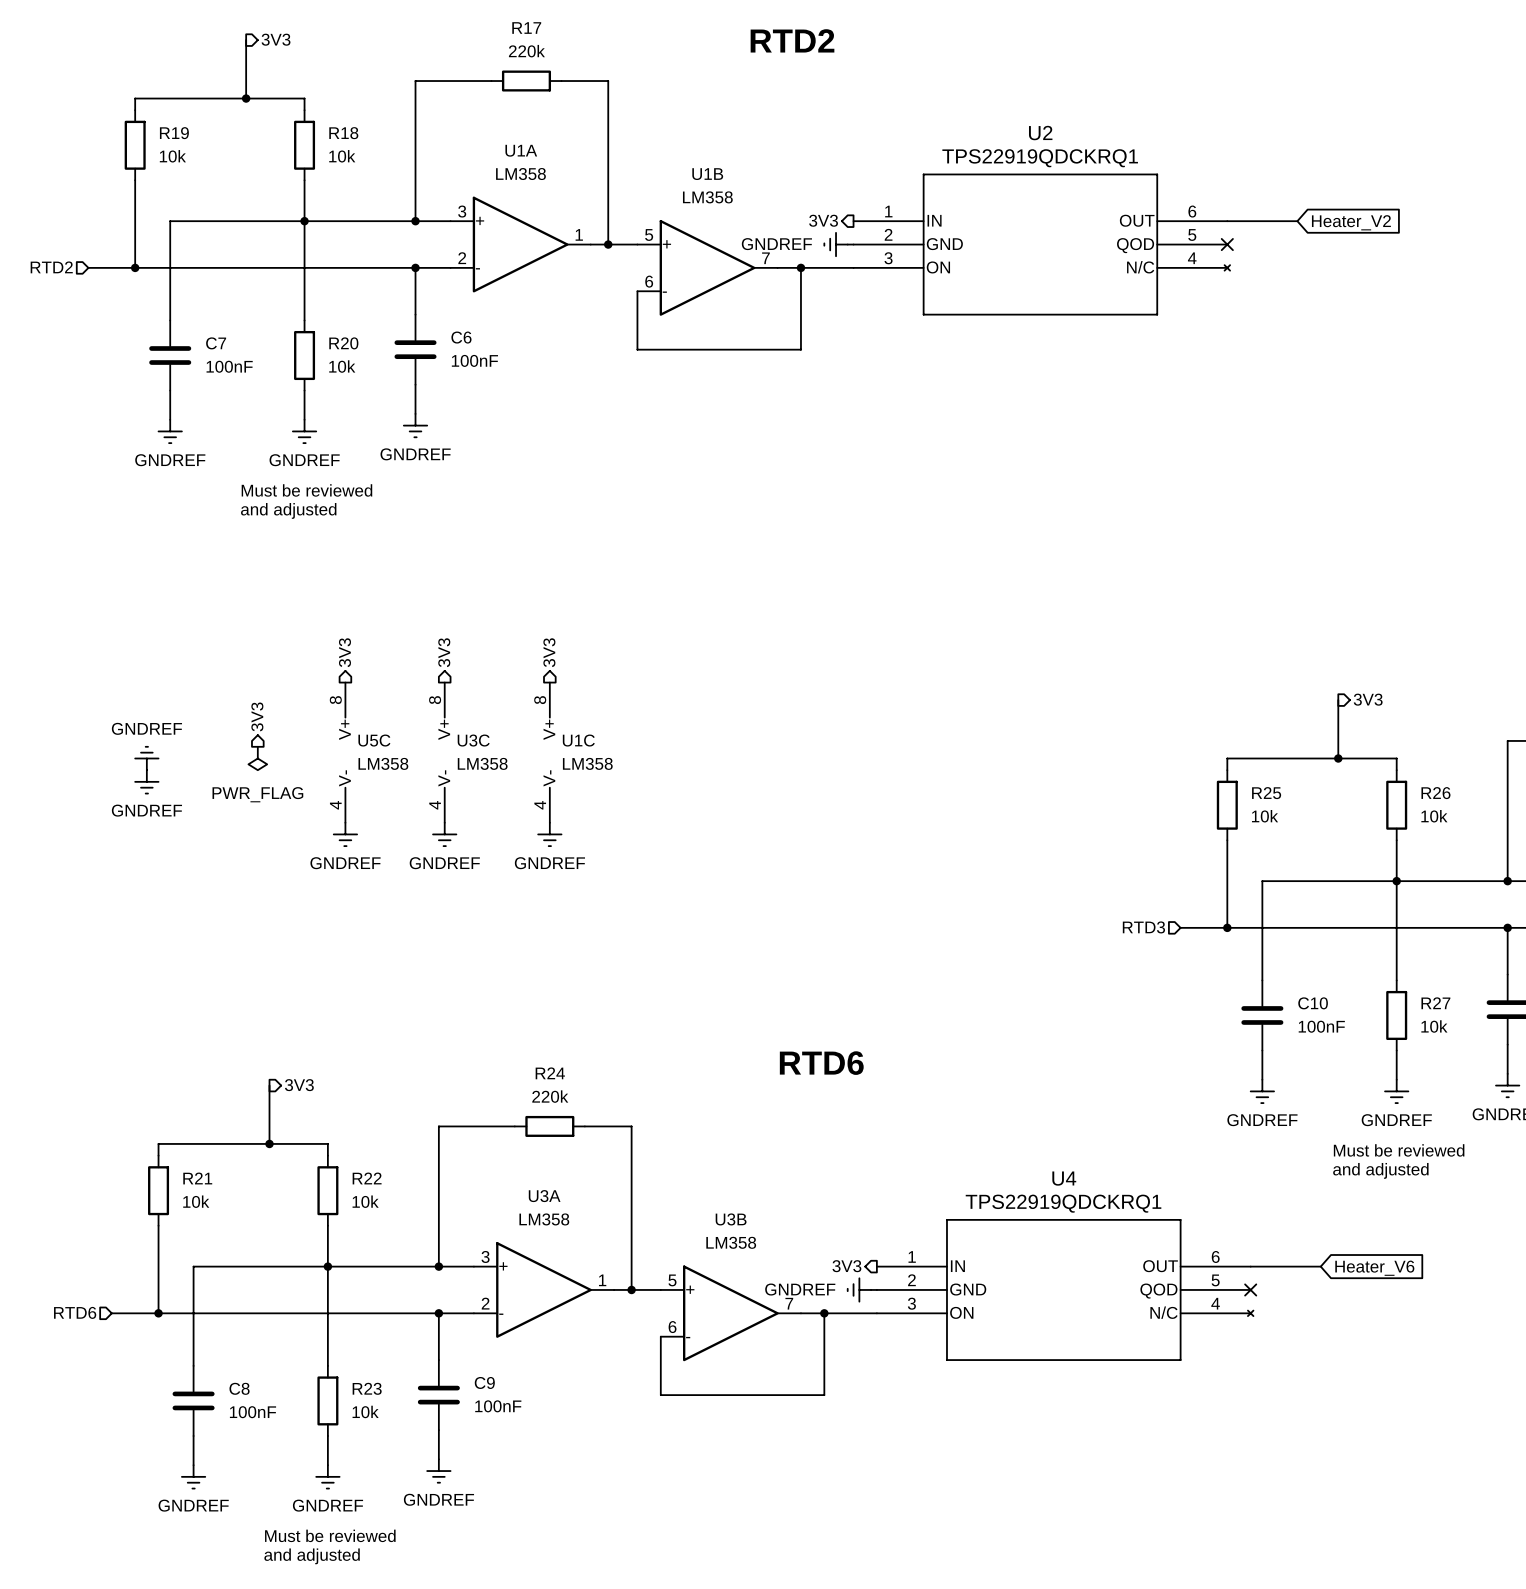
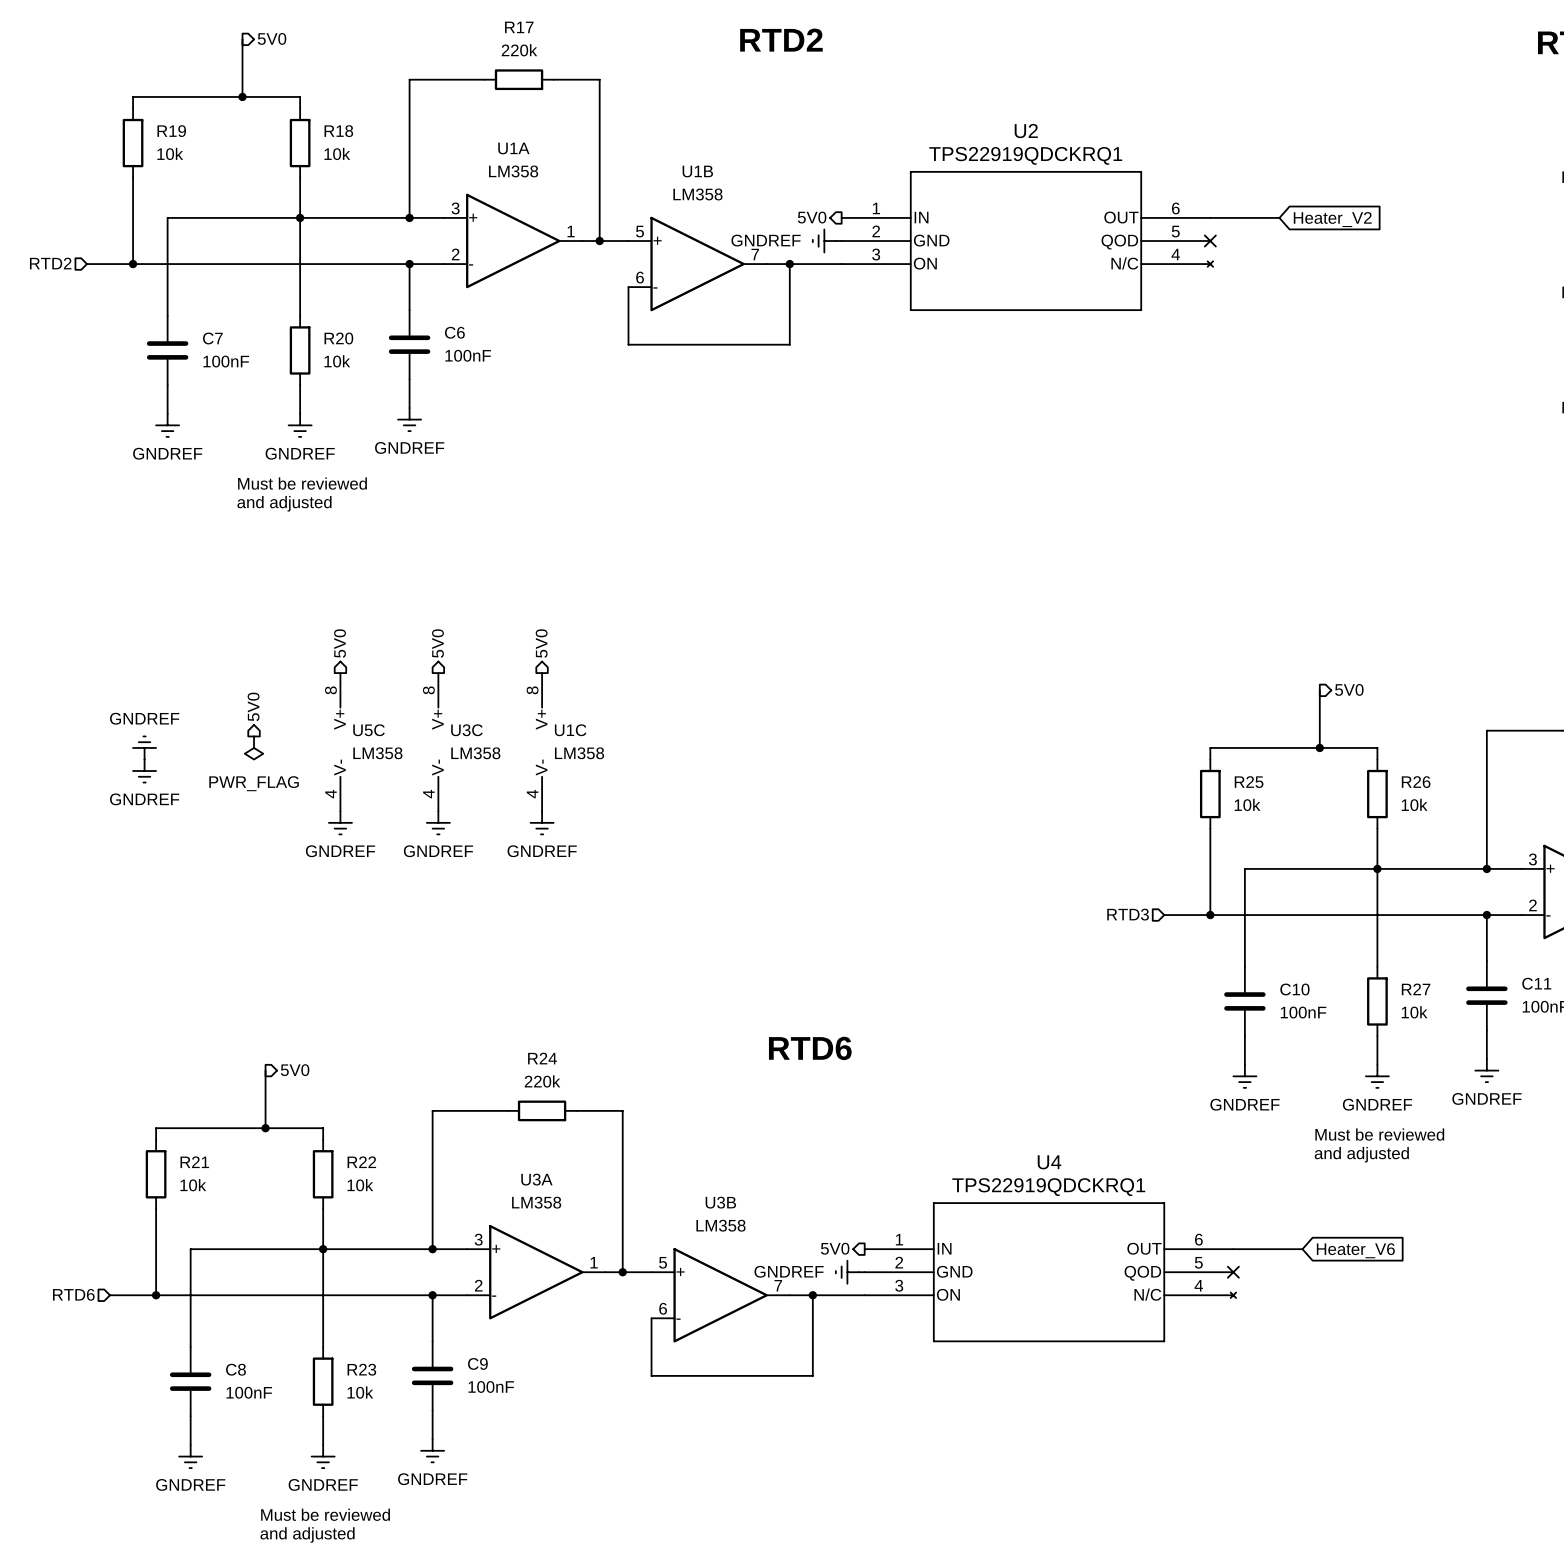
hierarchical label: 3V3 (276, 39) -> 5V0 (272, 38)
hierarchical label: 3V3 (823, 220) -> 5V0 (812, 217)
hierarchical label: 3V3 (344, 652) -> 5V0 (340, 643)
hierarchical label: 3V3 (444, 652) -> 5V0 (437, 643)
hierarchical label: 3V3 (549, 652) -> 5V0 (541, 643)
hierarchical label: 3V3 (1368, 699) -> 5V0 (1349, 689)
hierarchical label: 3V3 (257, 716) -> 5V0 (253, 706)
hierarchical label: 3V3 (299, 1085) -> 5V0 (295, 1070)
hierarchical label: 3V3 (846, 1266) -> 5V0 (835, 1248)

